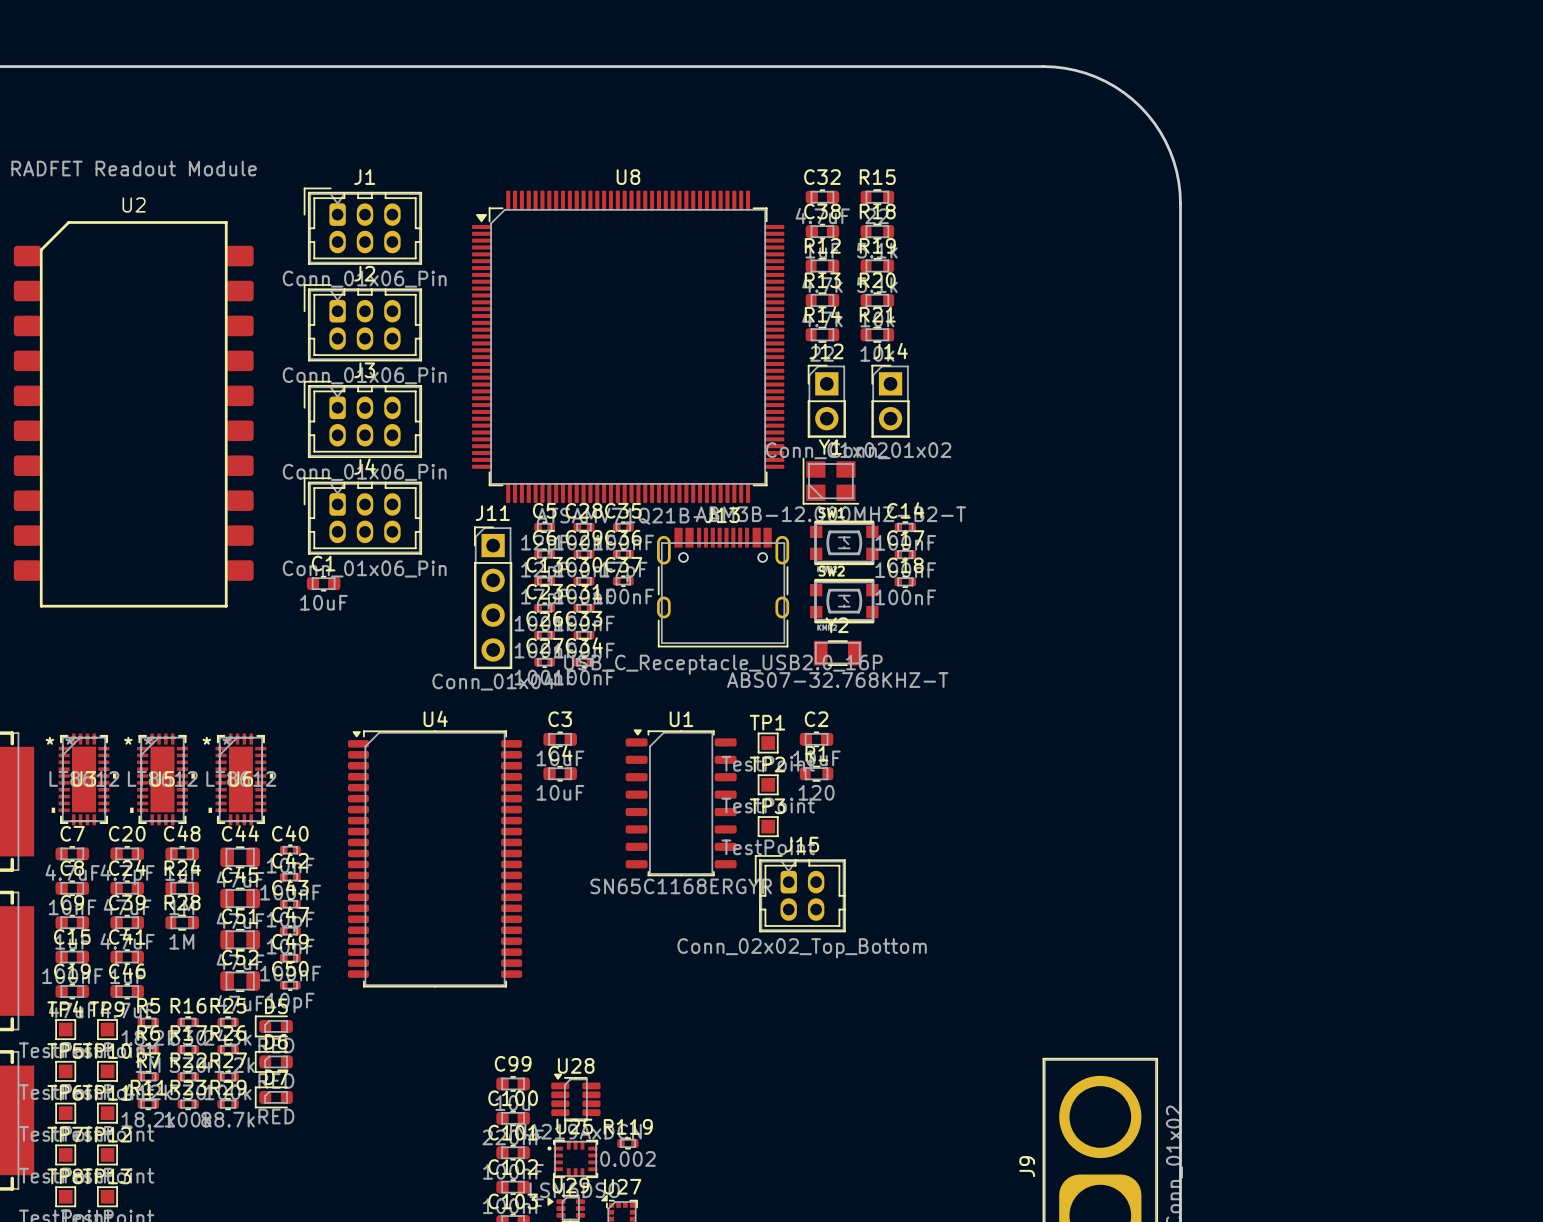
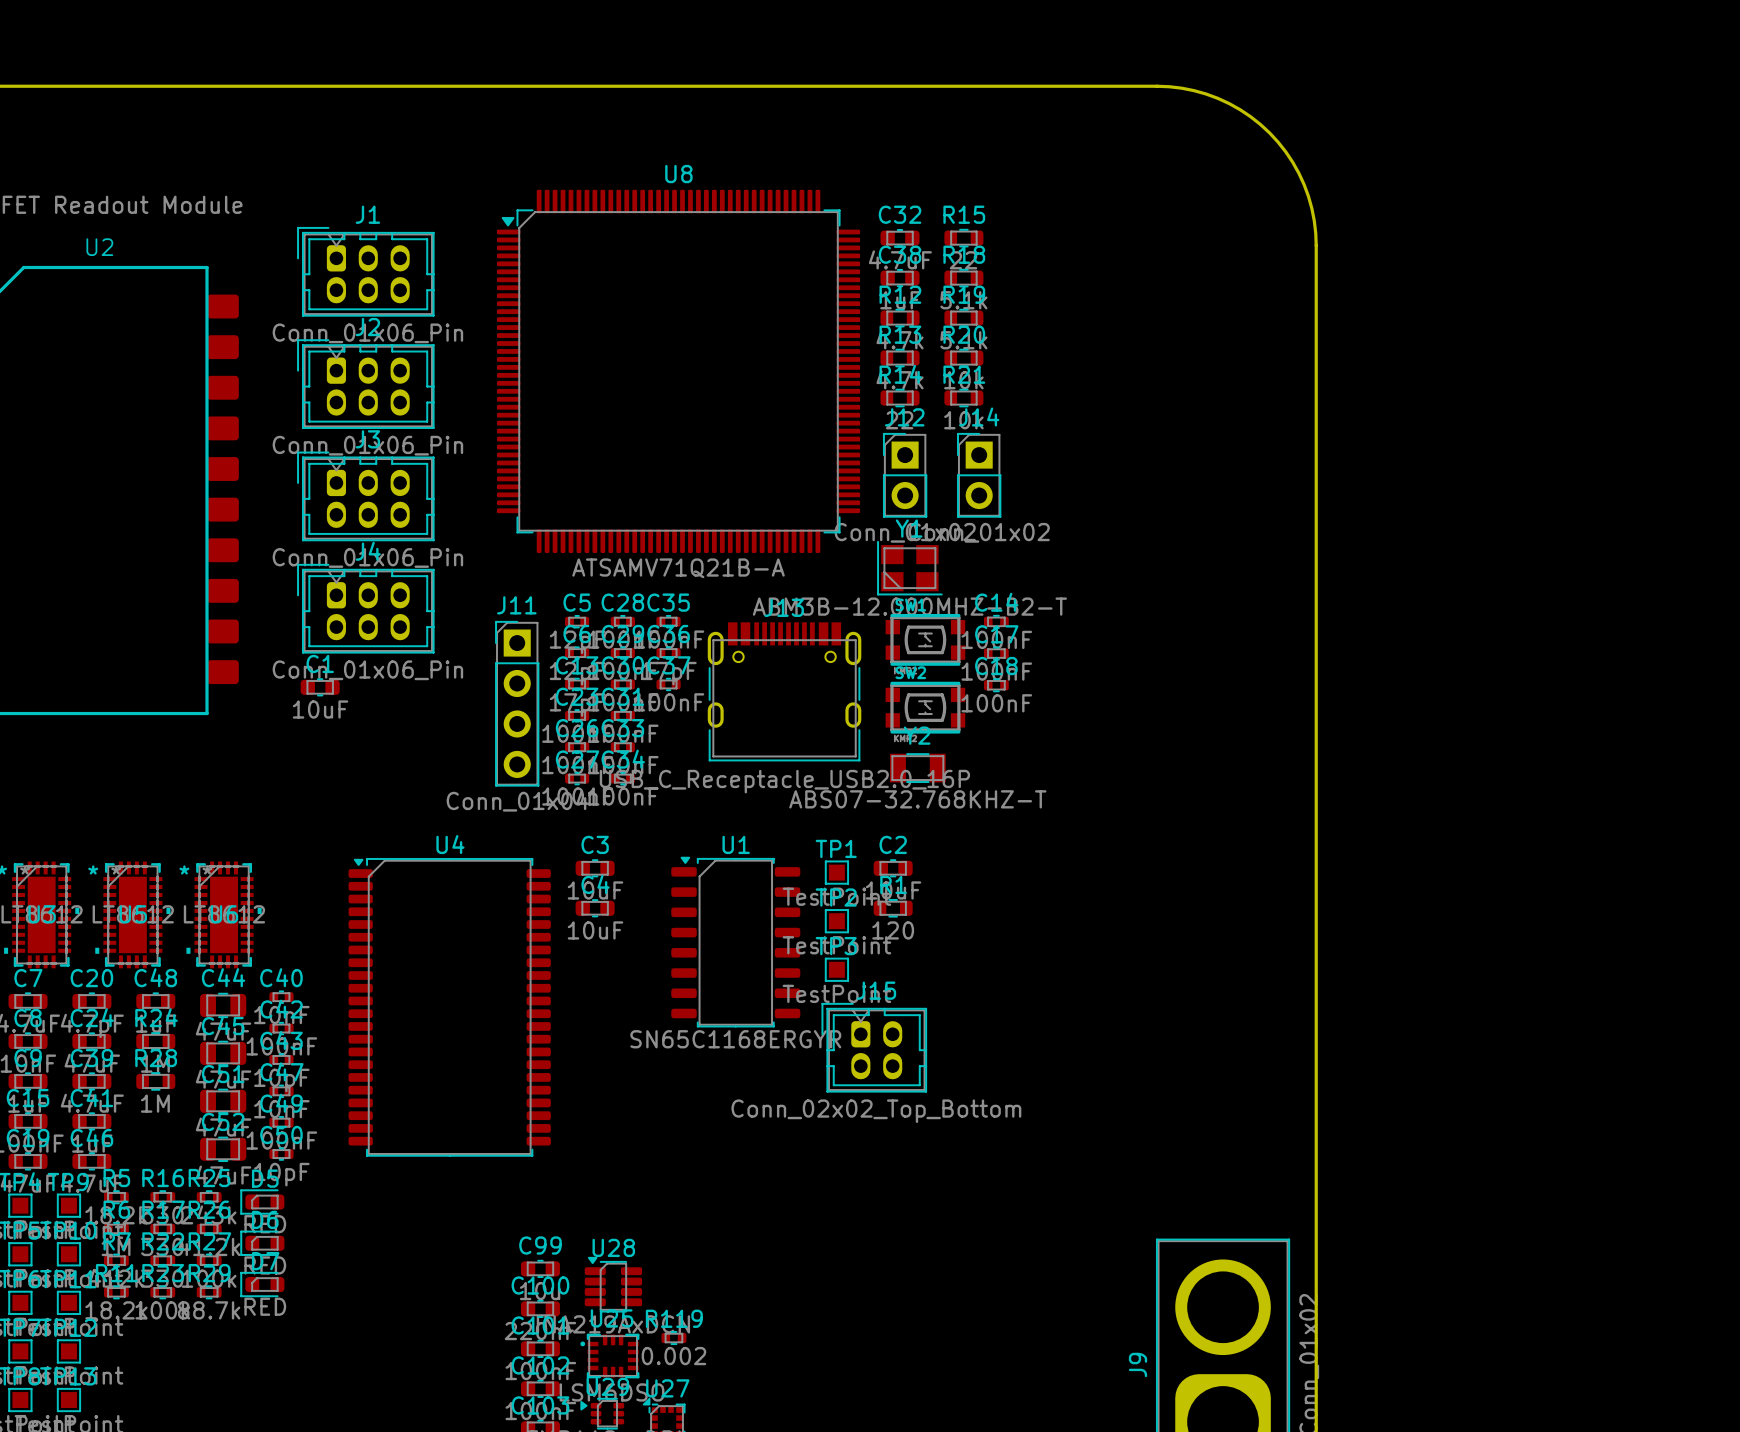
U8 position: (628, 346) -> (678, 371)

